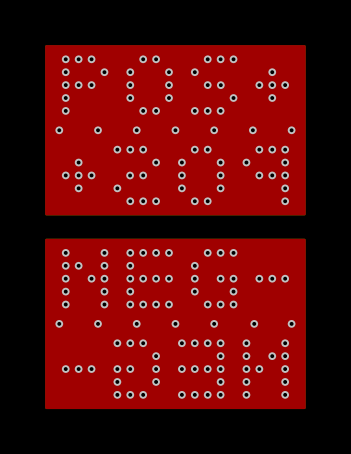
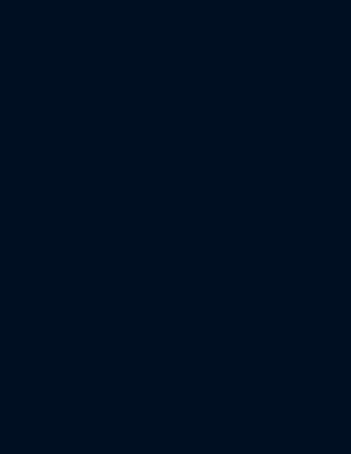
drawing: [45, 45, 306, 216] -> none
via: (65, 59) -> none
via: (78, 59) -> none
via: (91, 59) -> none
via: (143, 59) -> none
via: (156, 59) -> none
via: (207, 59) -> none
via: (220, 59) -> none
via: (233, 59) -> none
via: (65, 72) -> none
via: (104, 72) -> none
via: (130, 72) -> none
via: (168, 72) -> none
via: (194, 72) -> none
via: (272, 72) -> none
via: (65, 85) -> none
via: (78, 85) -> none
via: (91, 85) -> none
via: (130, 85) -> none
via: (168, 85) -> none
via: (207, 85) -> none
via: (220, 85) -> none
via: (259, 85) -> none
via: (272, 85) -> none
via: (285, 85) -> none
via: (65, 98) -> none
via: (130, 98) -> none
via: (168, 98) -> none
via: (233, 98) -> none
via: (272, 98) -> none
via: (65, 110) -> none
via: (143, 110) -> none
via: (156, 110) -> none
via: (194, 110) -> none
via: (207, 110) -> none
via: (220, 110) -> none
via: (59, 130) -> none
via: (98, 130) -> none
via: (136, 130) -> none
via: (175, 130) -> none
via: (214, 130) -> none
via: (252, 130) -> none
via: (291, 130) -> none
via: (117, 149) -> none
via: (130, 149) -> none
via: (143, 149) -> none
via: (194, 149) -> none
via: (207, 149) -> none
via: (259, 149) -> none
via: (272, 149) -> none
via: (285, 149) -> none
via: (78, 162) -> none
via: (156, 162) -> none
via: (181, 162) -> none
via: (220, 162) -> none
via: (246, 162) -> none
via: (285, 162) -> none
via: (65, 175) -> none
via: (78, 175) -> none
via: (91, 175) -> none
via: (130, 175) -> none
via: (143, 175) -> none
via: (181, 175) -> none
via: (220, 175) -> none
via: (259, 175) -> none
via: (272, 175) -> none
via: (285, 175) -> none
via: (78, 188) -> none
via: (117, 188) -> none
via: (181, 188) -> none
via: (220, 188) -> none
via: (285, 188) -> none
via: (130, 201) -> none
via: (143, 201) -> none
via: (156, 201) -> none
via: (194, 201) -> none
via: (207, 201) -> none
via: (285, 201) -> none
drawing: [45, 238, 306, 410] -> none
via: (65, 252) -> none
via: (104, 252) -> none
via: (130, 252) -> none
via: (143, 252) -> none
via: (156, 252) -> none
via: (168, 252) -> none
via: (207, 252) -> none
via: (220, 252) -> none
via: (233, 252) -> none
via: (65, 265) -> none
via: (78, 265) -> none
via: (104, 265) -> none
via: (130, 265) -> none
via: (194, 265) -> none
via: (65, 278) -> none
via: (91, 278) -> none
via: (104, 278) -> none
via: (130, 278) -> none
via: (143, 278) -> none
via: (156, 278) -> none
via: (168, 278) -> none
via: (194, 278) -> none
via: (220, 278) -> none
via: (233, 278) -> none
via: (259, 278) -> none
via: (272, 278) -> none
via: (285, 278) -> none
via: (65, 291) -> none
via: (104, 291) -> none
via: (130, 291) -> none
via: (194, 291) -> none
via: (233, 291) -> none
via: (65, 304) -> none
via: (104, 304) -> none
via: (130, 304) -> none
via: (143, 304) -> none
via: (156, 304) -> none
via: (168, 304) -> none
via: (207, 304) -> none
via: (220, 304) -> none
via: (233, 304) -> none
via: (59, 323) -> none
via: (98, 323) -> none
via: (136, 323) -> none
via: (175, 323) -> none
via: (214, 323) -> none
via: (254, 323) -> none
via: (291, 323) -> none
via: (117, 343) -> none
via: (130, 343) -> none
via: (143, 343) -> none
via: (181, 343) -> none
via: (194, 343) -> none
via: (207, 343) -> none
via: (220, 343) -> none
via: (246, 343) -> none
via: (285, 343) -> none
via: (156, 356) -> none
via: (220, 356) -> none
via: (246, 356) -> none
via: (272, 356) -> none
via: (285, 356) -> none
via: (65, 369) -> none
via: (78, 369) -> none
via: (91, 369) -> none
via: (117, 369) -> none
via: (130, 369) -> none
via: (156, 369) -> none
via: (181, 369) -> none
via: (194, 369) -> none
via: (207, 369) -> none
via: (220, 369) -> none
via: (246, 369) -> none
via: (259, 369) -> none
via: (285, 369) -> none
via: (117, 381) -> none
via: (156, 381) -> none
via: (220, 381) -> none
via: (246, 381) -> none
via: (285, 381) -> none
via: (117, 394) -> none
via: (130, 394) -> none
via: (143, 394) -> none
via: (181, 394) -> none
via: (194, 394) -> none
via: (207, 394) -> none
via: (220, 394) -> none
via: (246, 394) -> none
via: (285, 394) -> none

